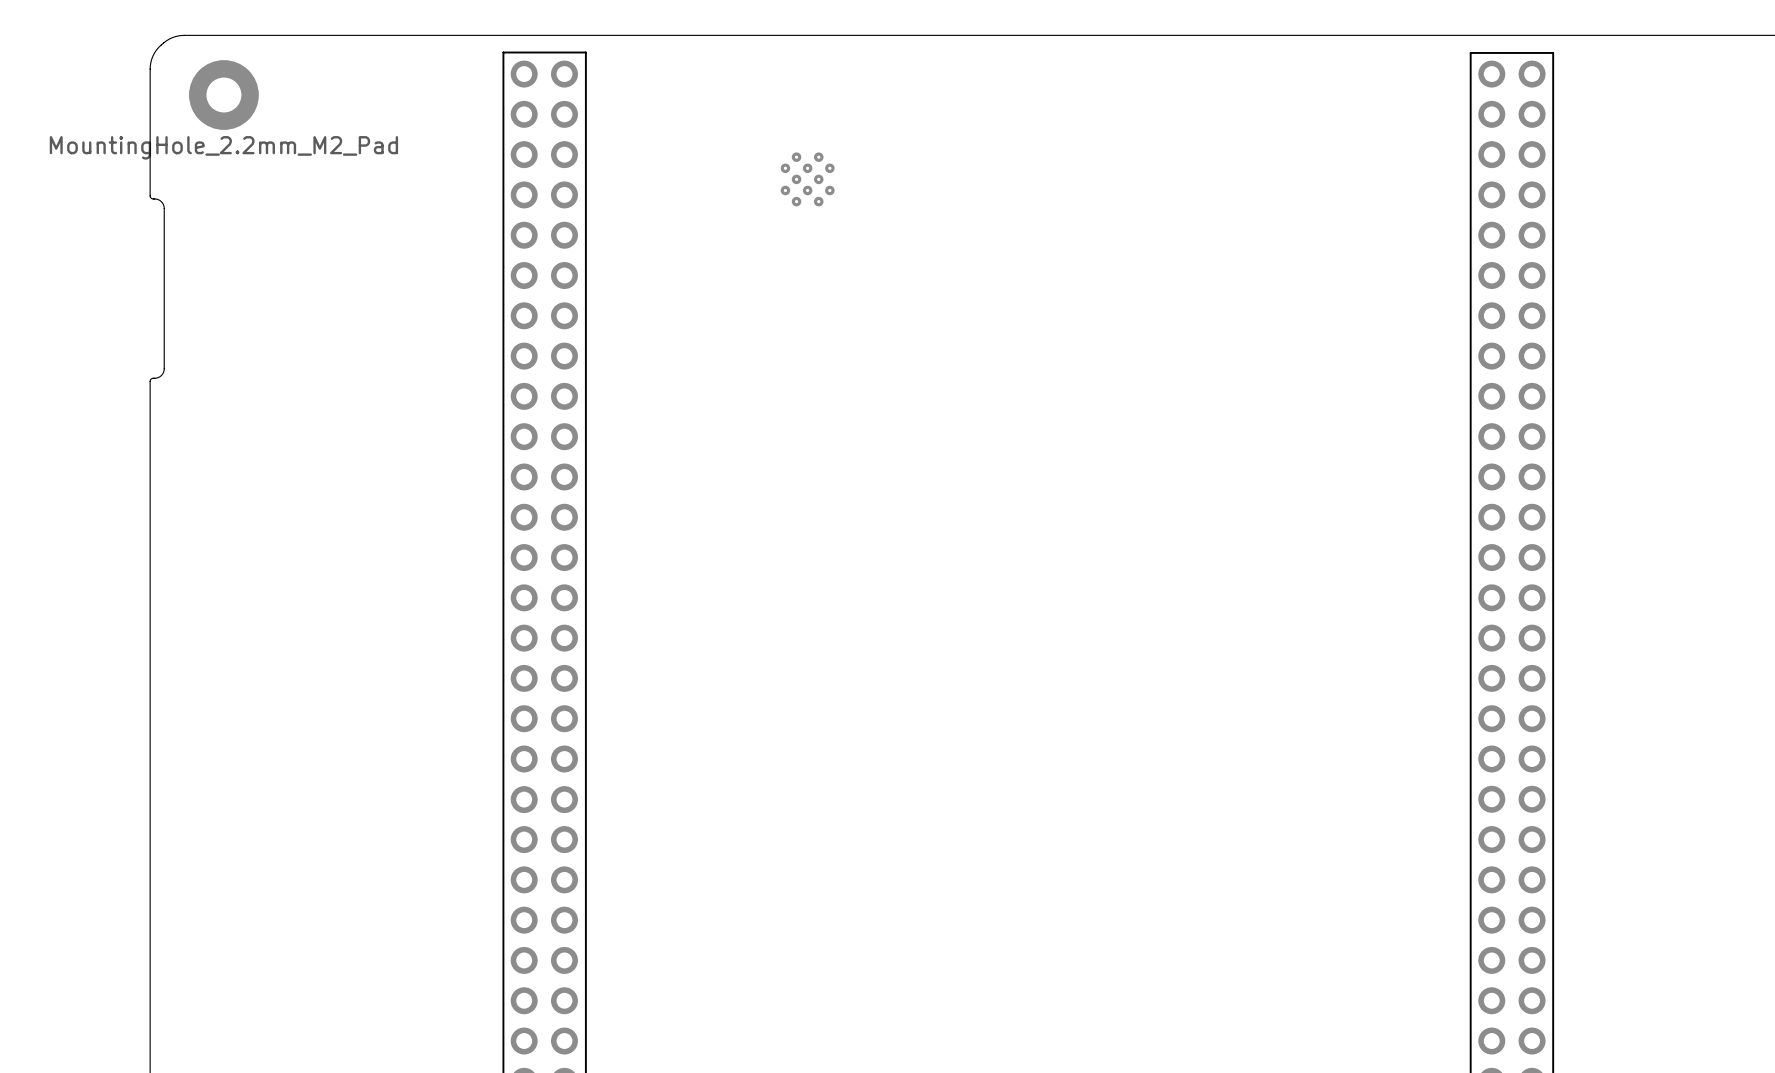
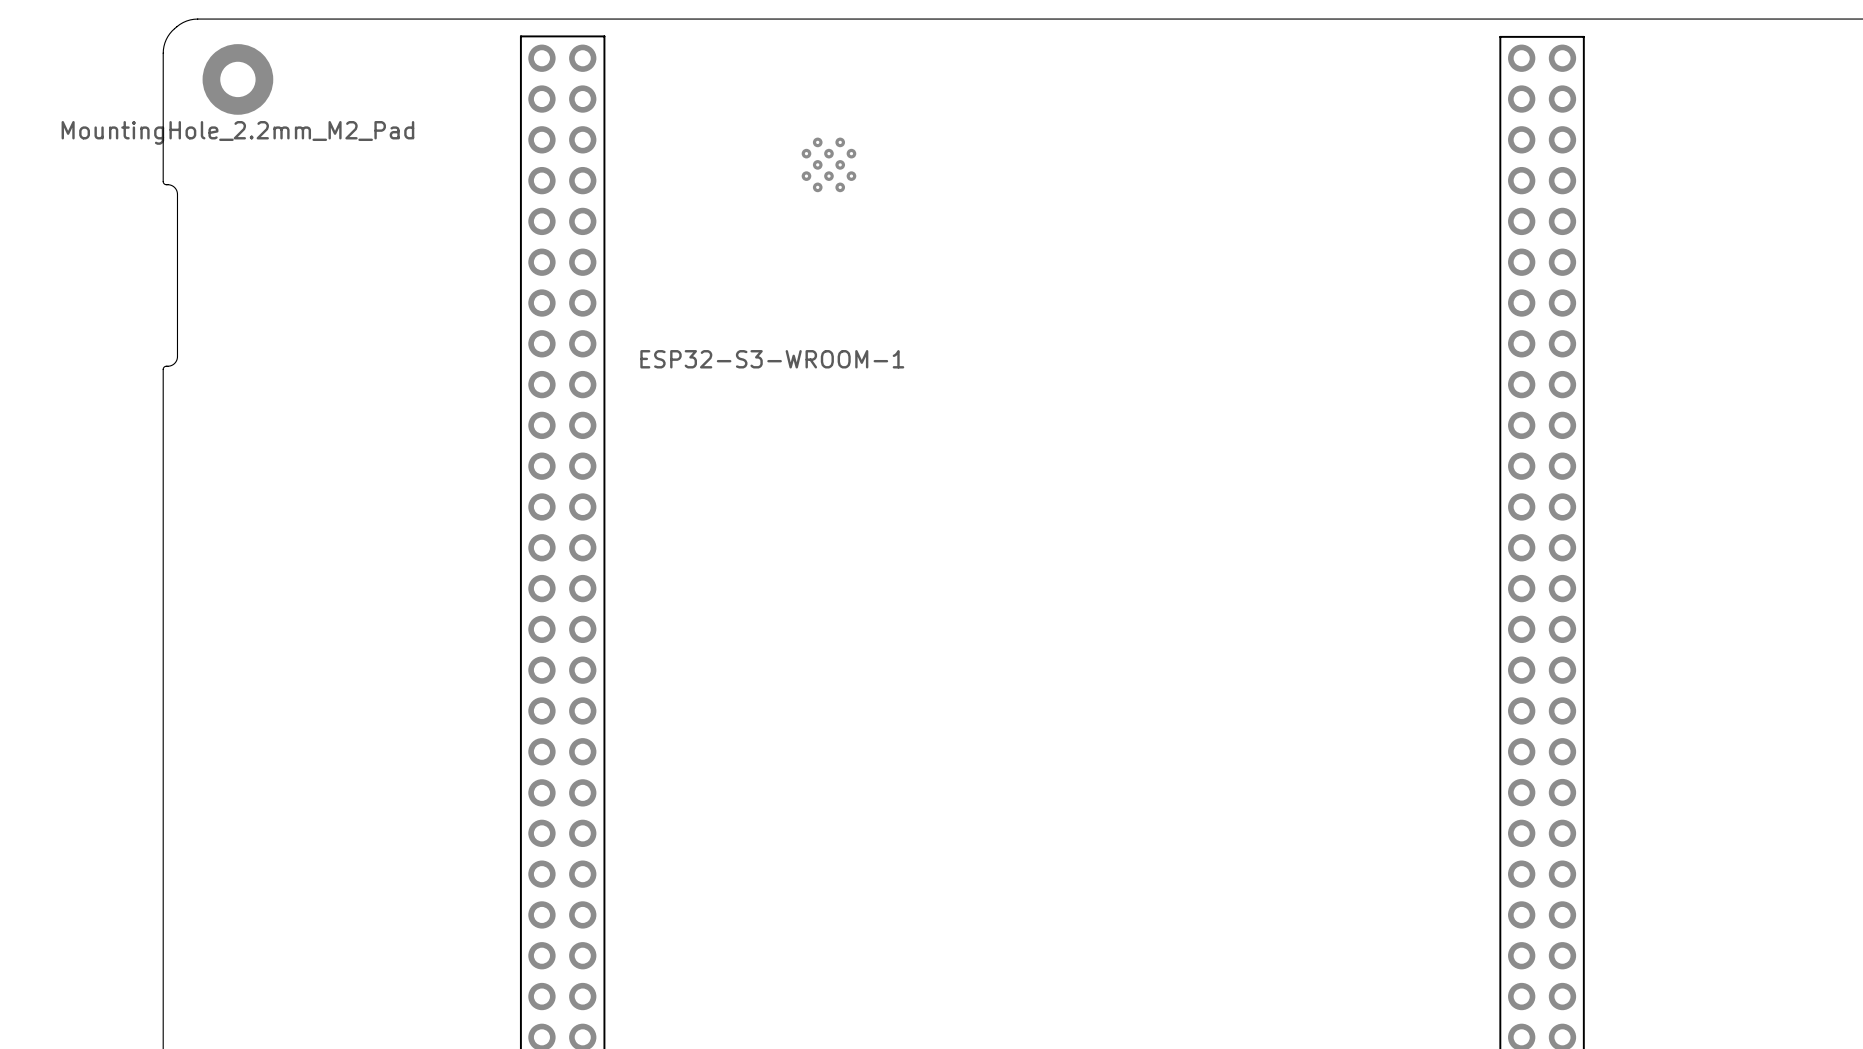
part value: none -> ESP32-S3-WROOM-1 (772, 359)

